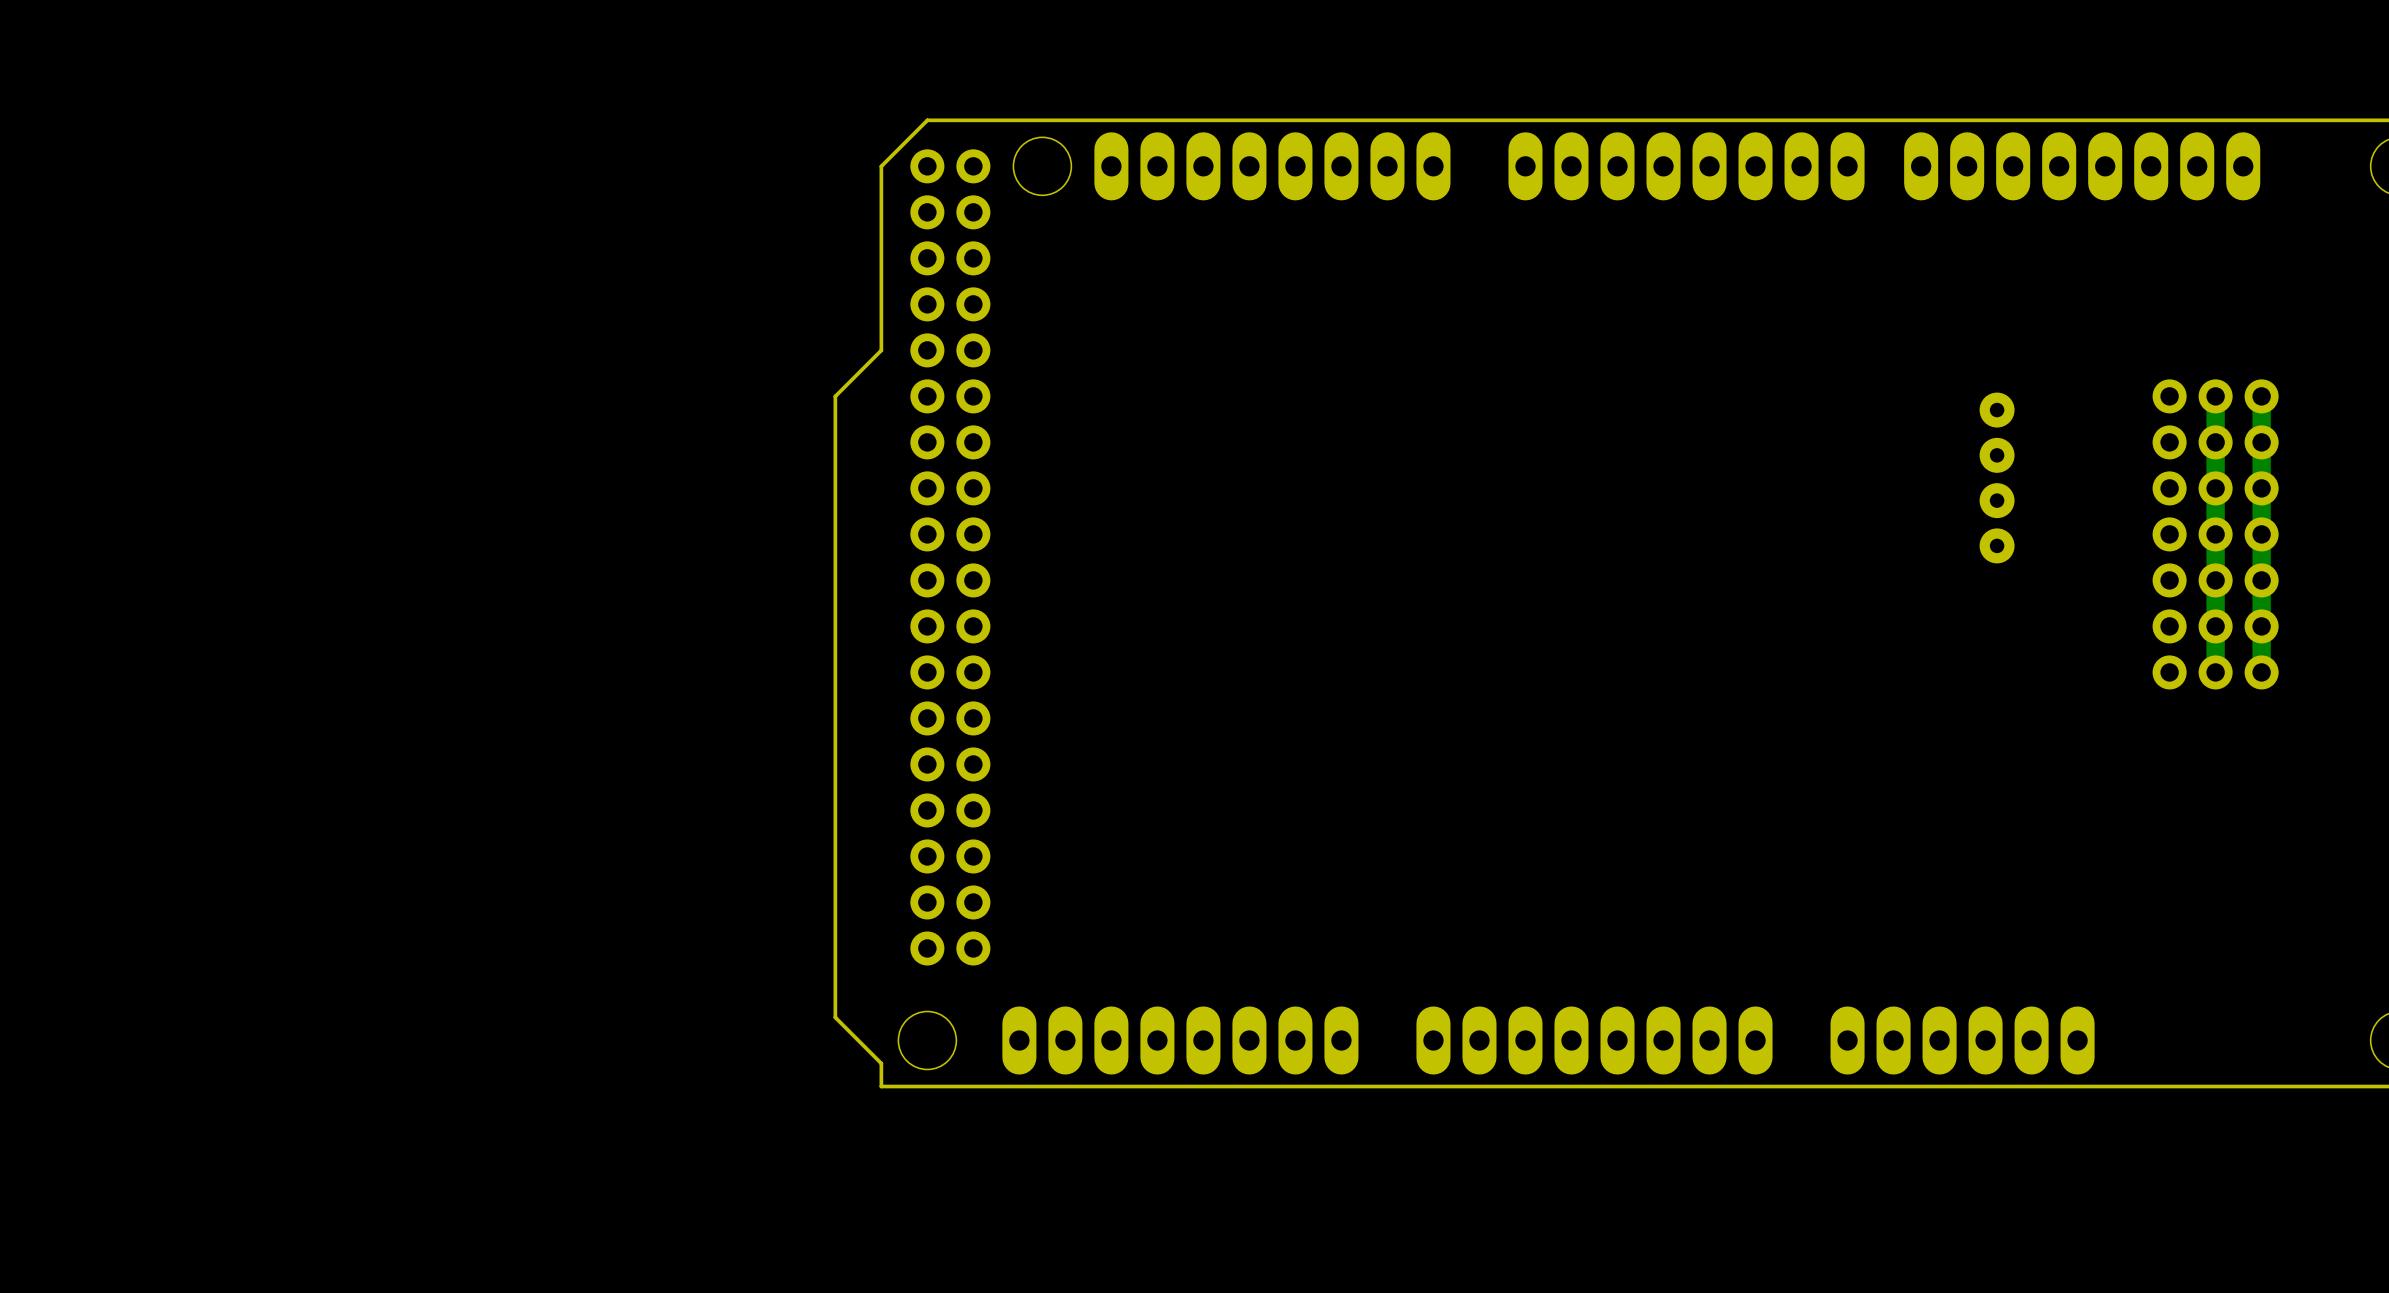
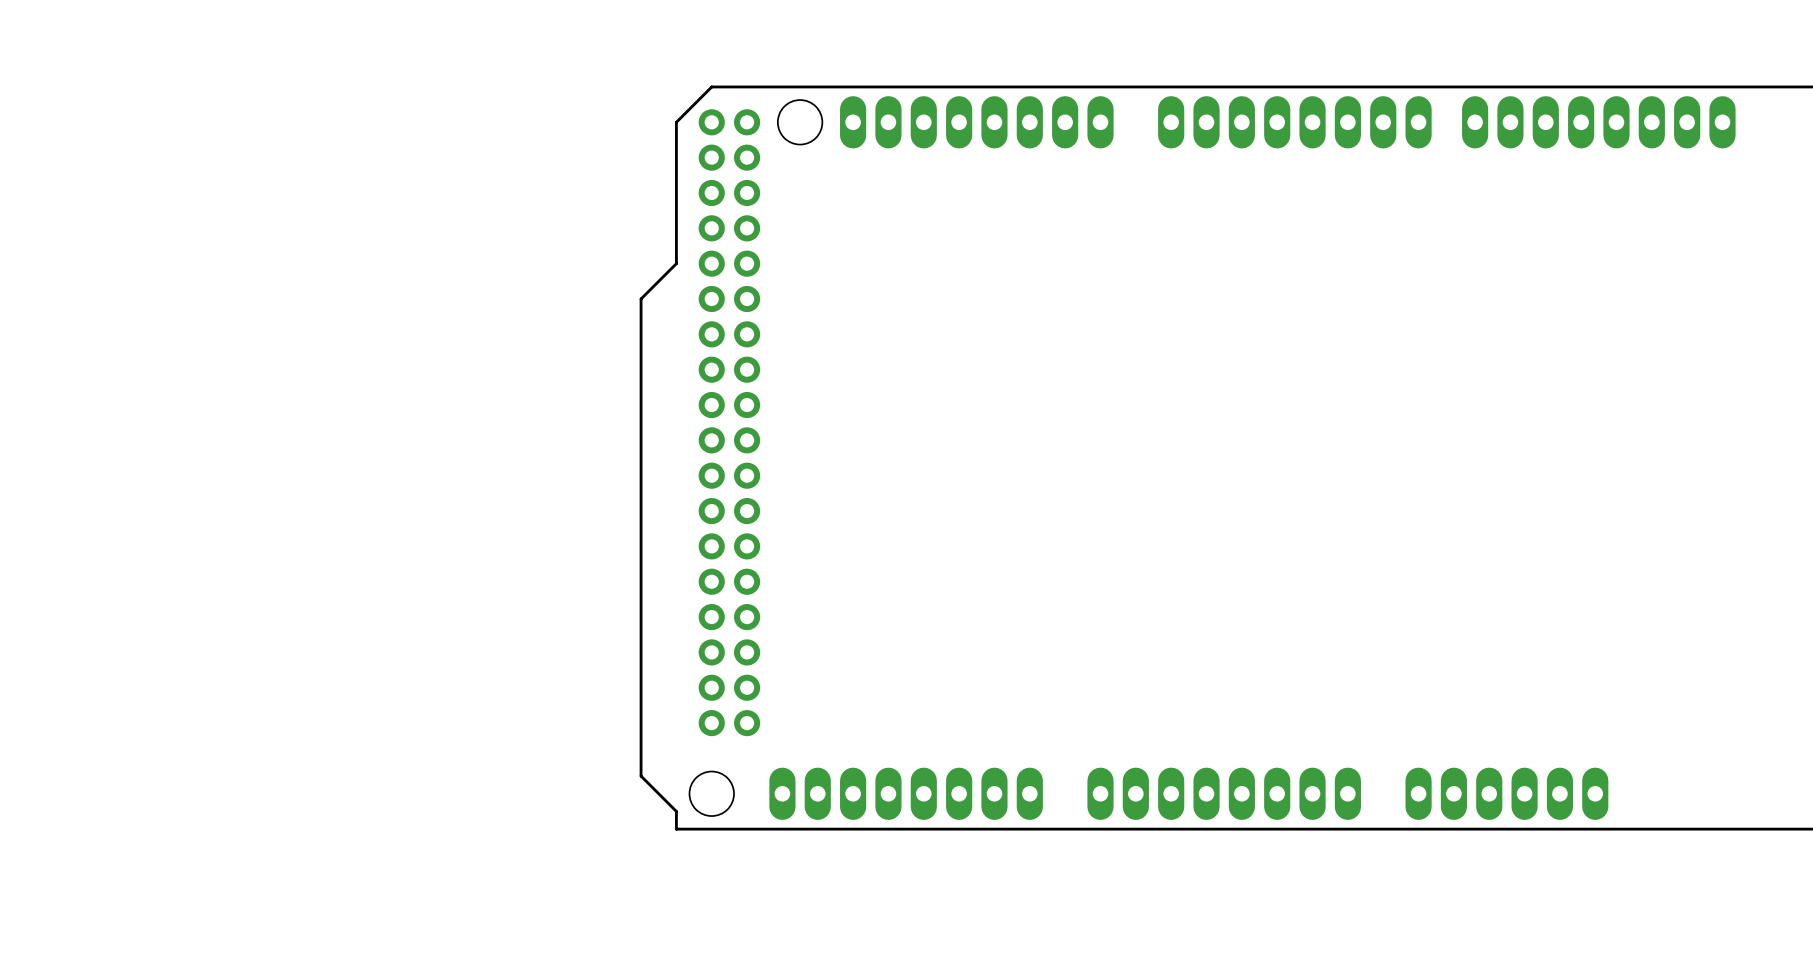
part: (1997, 477) -> none
part: (2215, 534) -> none

